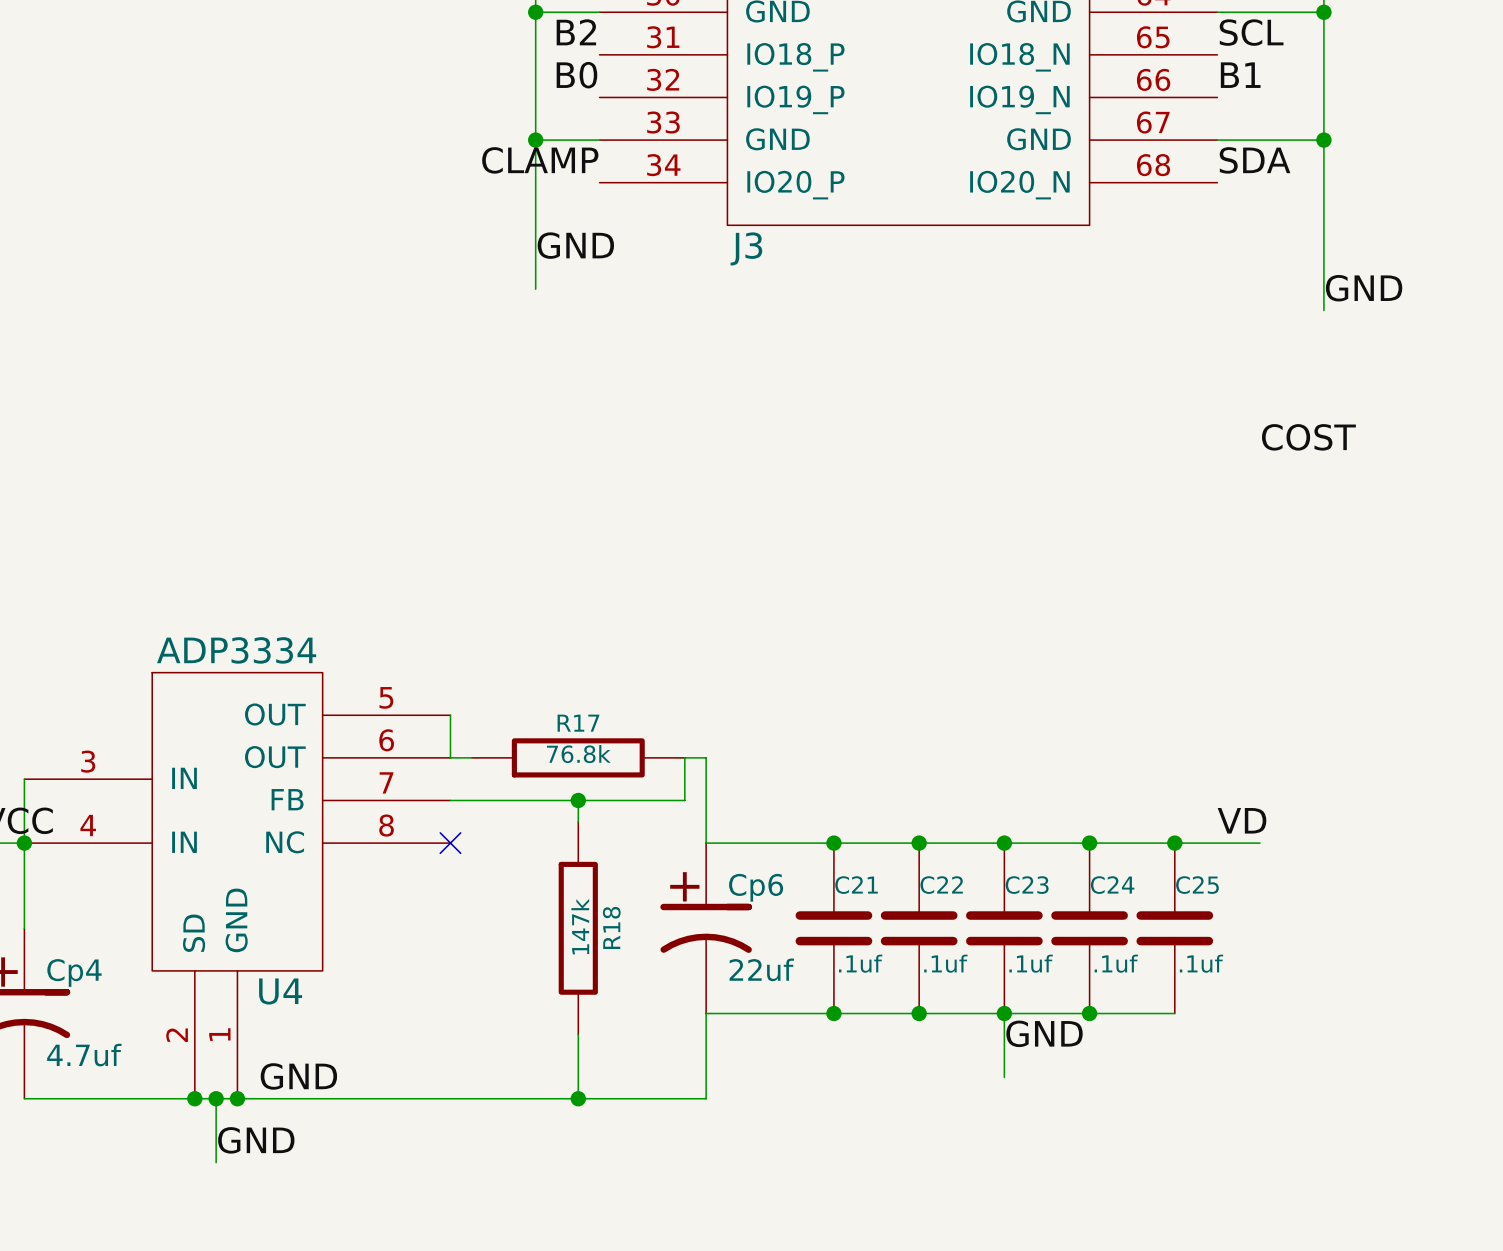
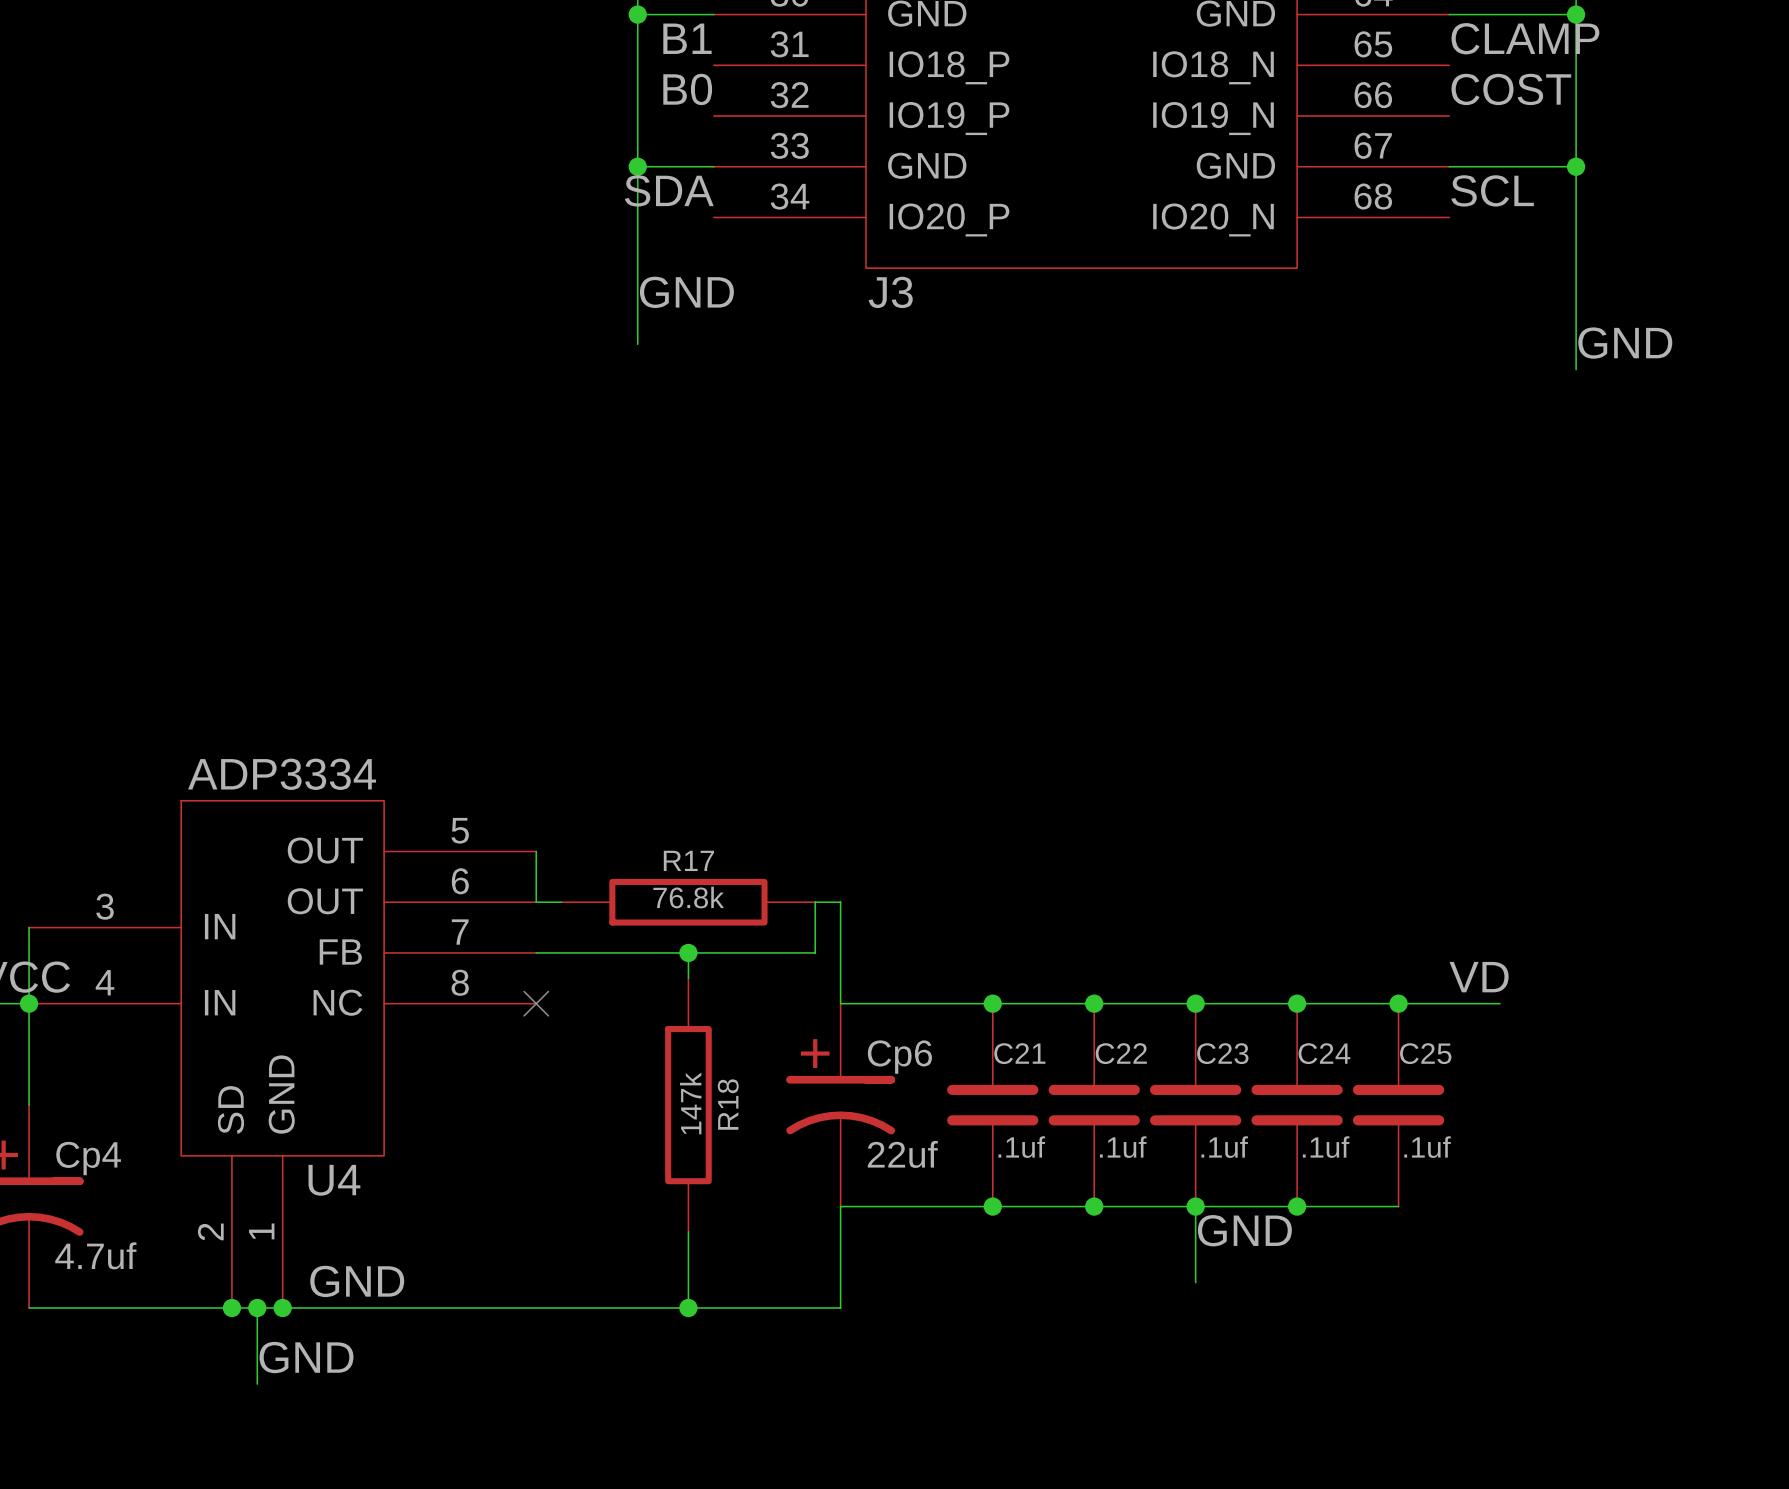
label: B2 (576, 32) -> B1 (687, 38)
label: SCL (1251, 32) -> CLAMP (1525, 38)
label: B1 (1240, 75) -> COST (1511, 89)
label: CLAMP (540, 160) -> SDA (669, 190)
label: SDA (1255, 160) -> SCL (1492, 190)
label: COST (1308, 437) -> none

